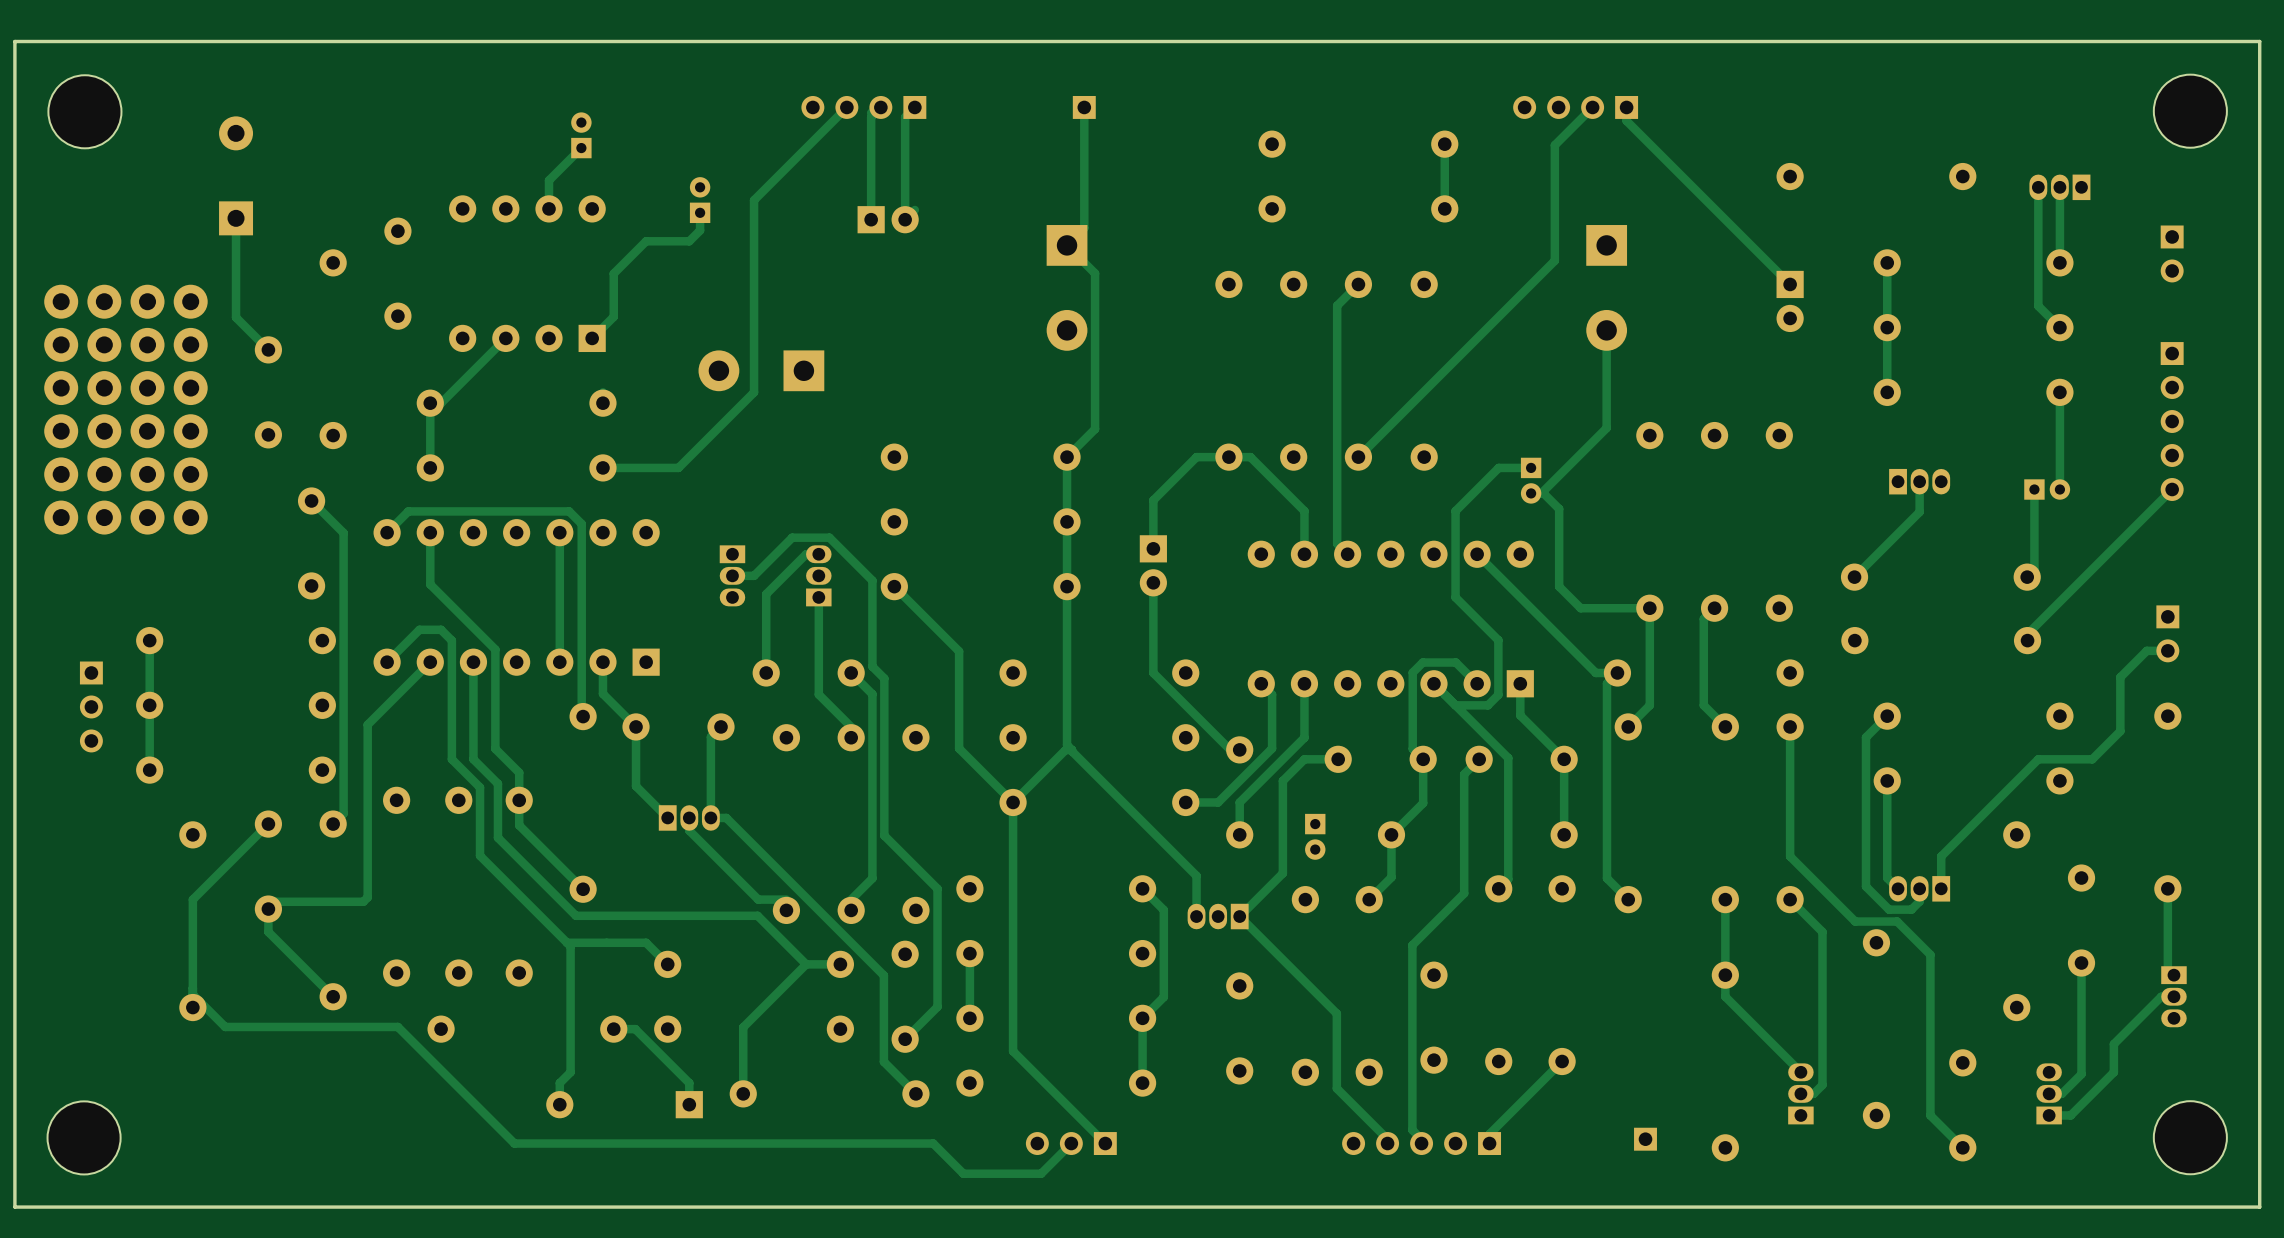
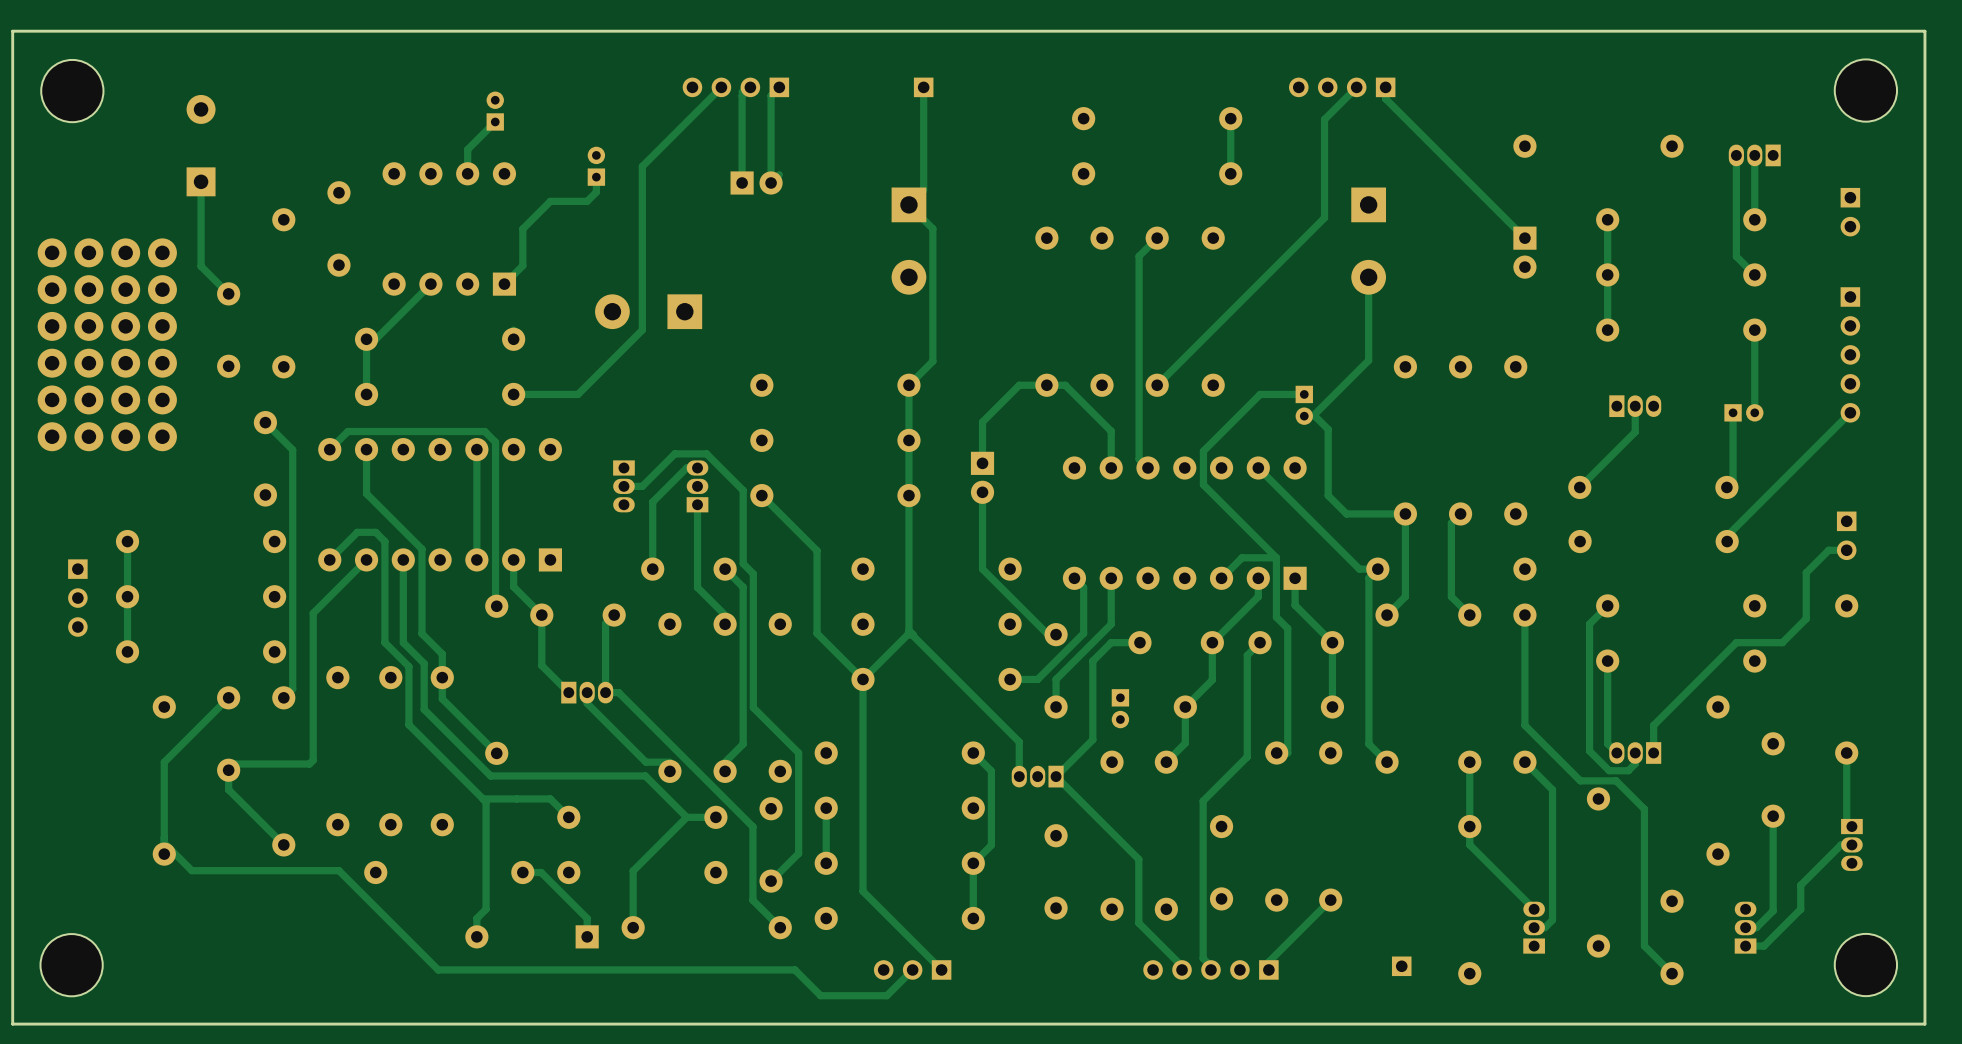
track: (1498, 467) (1455, 511) (1455, 597) (1498, 640) (1498, 659) -> (1276, 394) (1260, 394) (1203, 451) (1203, 484) (1276, 557) (1242, 557) (1221, 578)
track: (1433, 683) (1508, 758) (1508, 879) (1498, 888) -> (1276, 587) (1276, 617) (1287, 628) (1287, 752) (1276, 752)
track: (1477, 683) (1455, 662) (1422, 662) (1412, 672) (1412, 748) (1423, 759) -> (1258, 578) (1258, 596) (1212, 642)
track: (1498, 694) (1487, 705) (1455, 705) -> none

